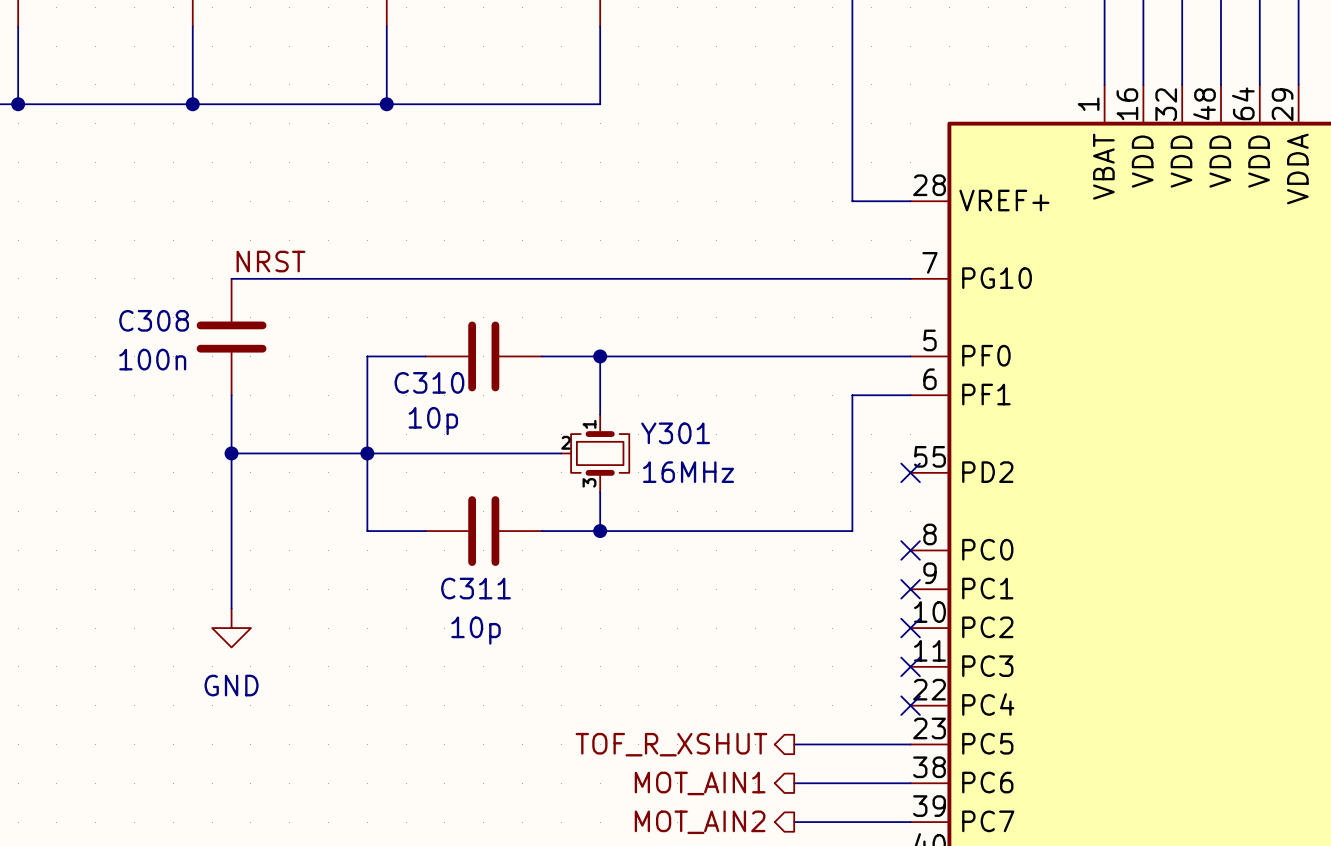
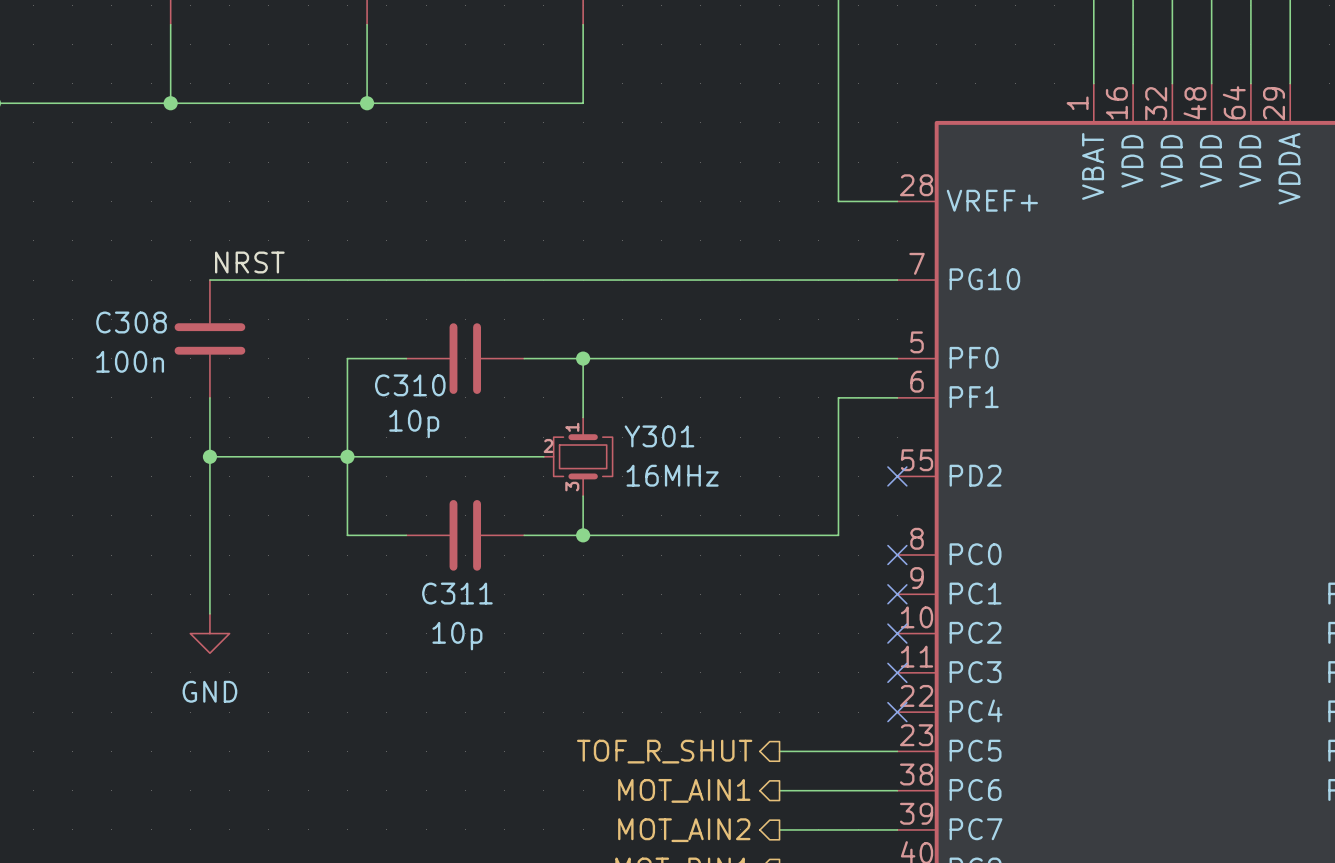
hierarchical label: TOF_R_XSHUT (671, 744) -> TOF_R_SHUT (664, 751)

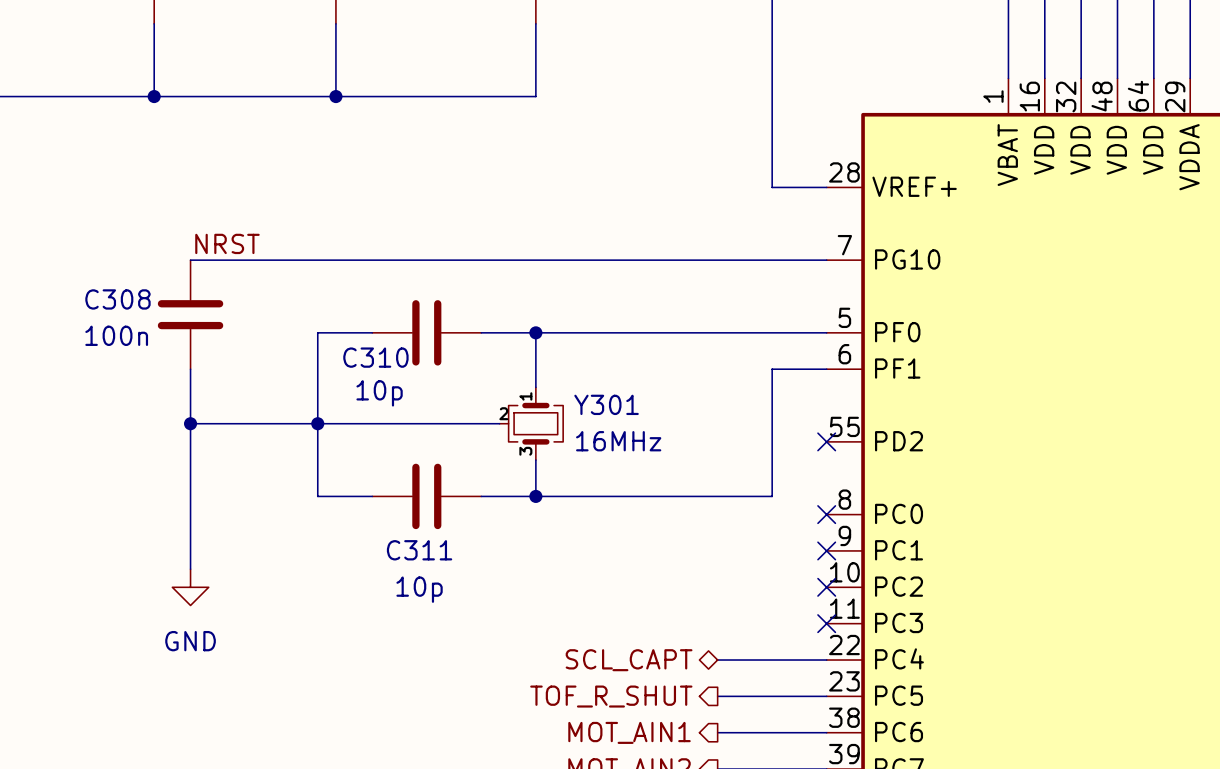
hierarchical label: none -> SCL_CAPT (629, 660)
wire: none -> (717, 660) (826, 660)
no-connect mark: (897, 712) -> none

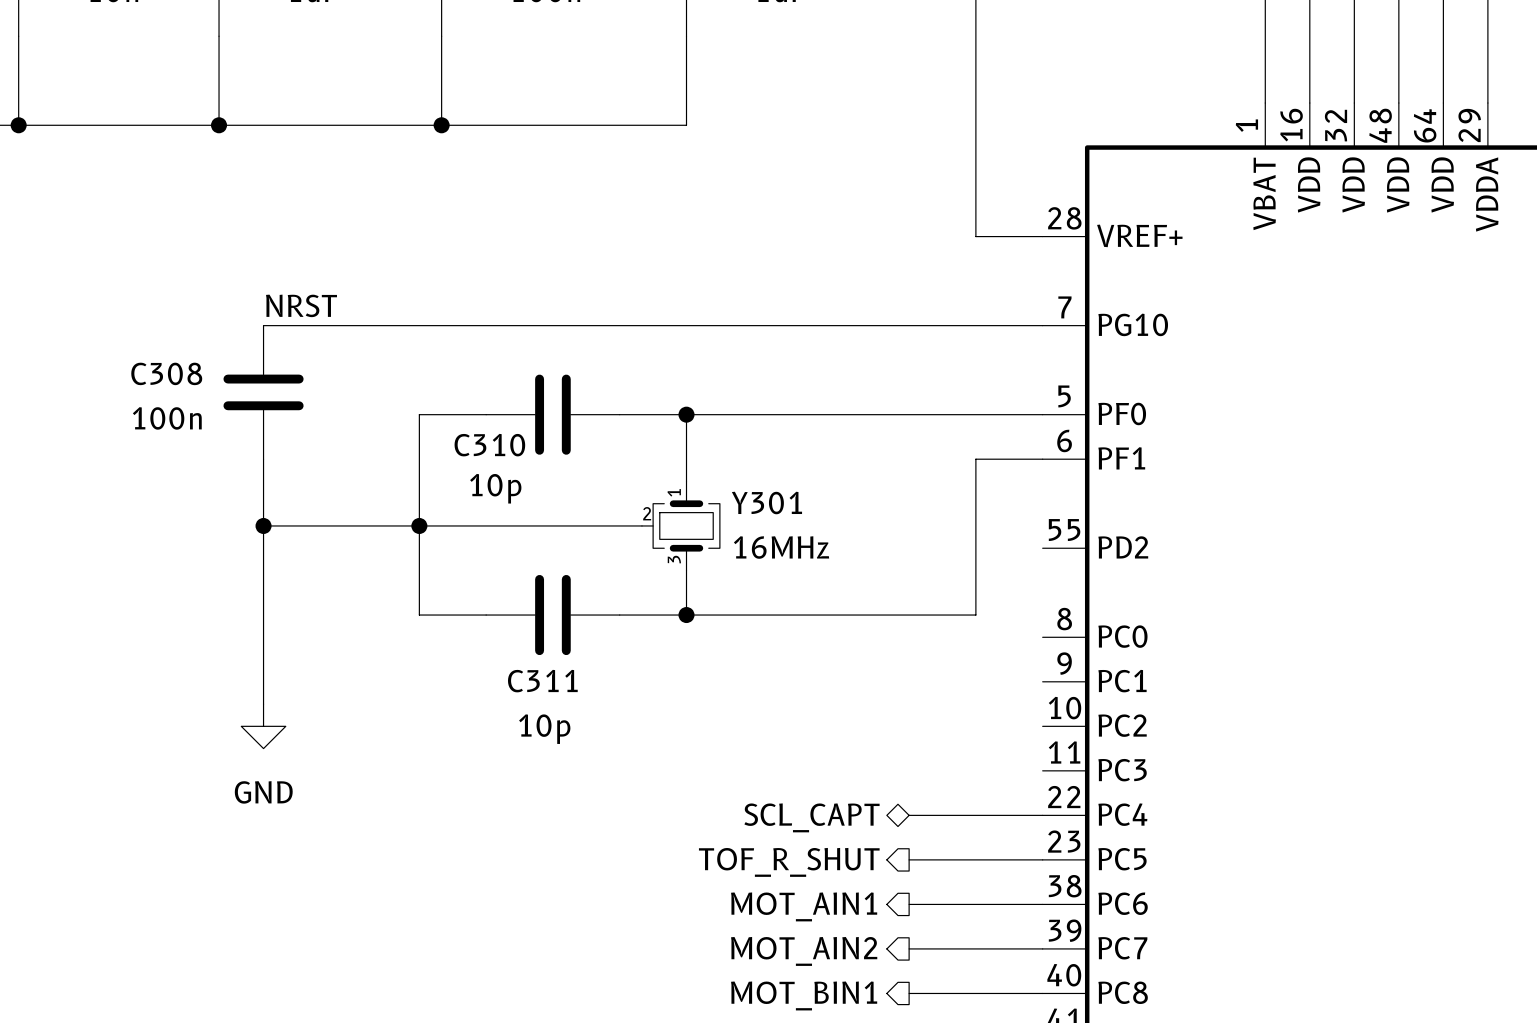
no-connect mark: (826, 441) -> none
no-connect mark: (826, 514) -> none
no-connect mark: (826, 550) -> none
no-connect mark: (826, 587) -> none
no-connect mark: (826, 623) -> none

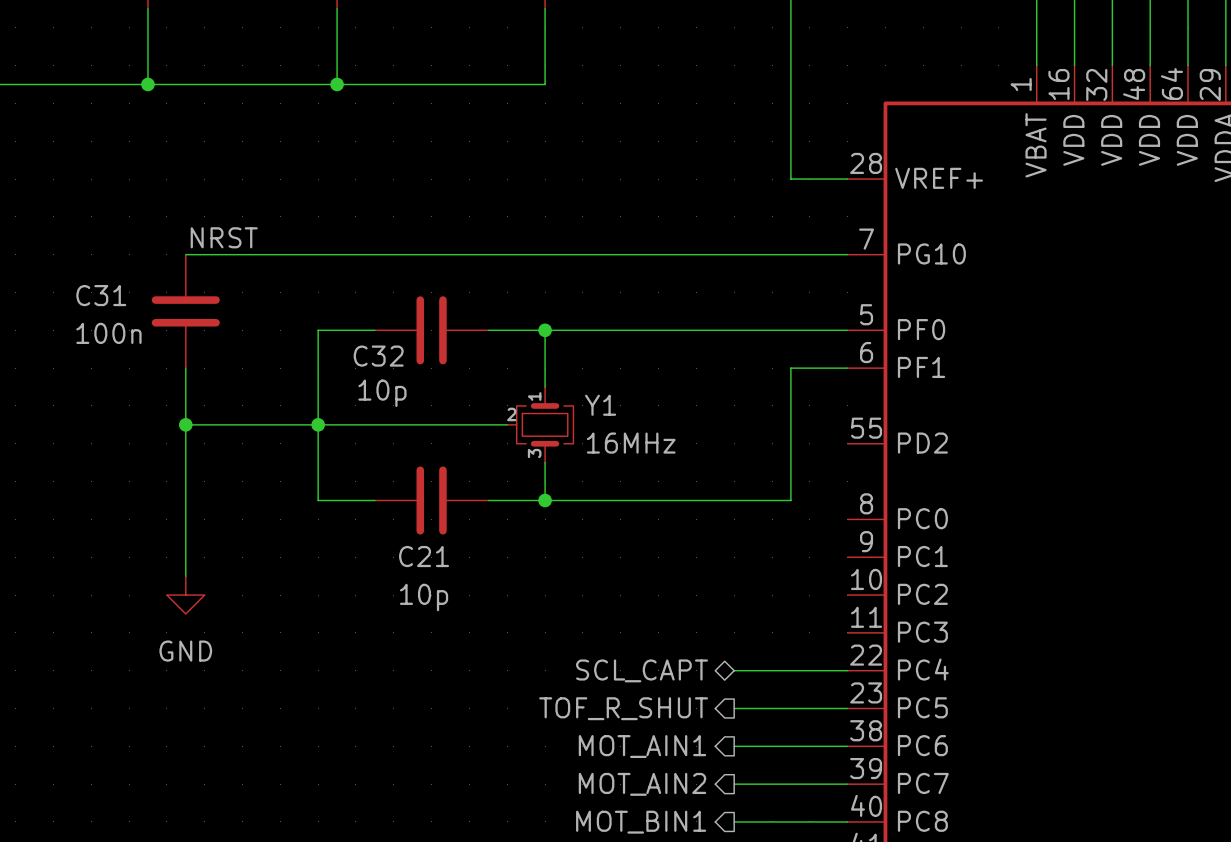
C308 name: C308 (166, 373) -> C31 (101, 295)
C310 name: C310 (489, 445) -> C32 (378, 356)
Y301 name: Y301 (766, 503) -> Y1 (600, 405)
C311 name: C311 (542, 681) -> C21 (424, 556)

